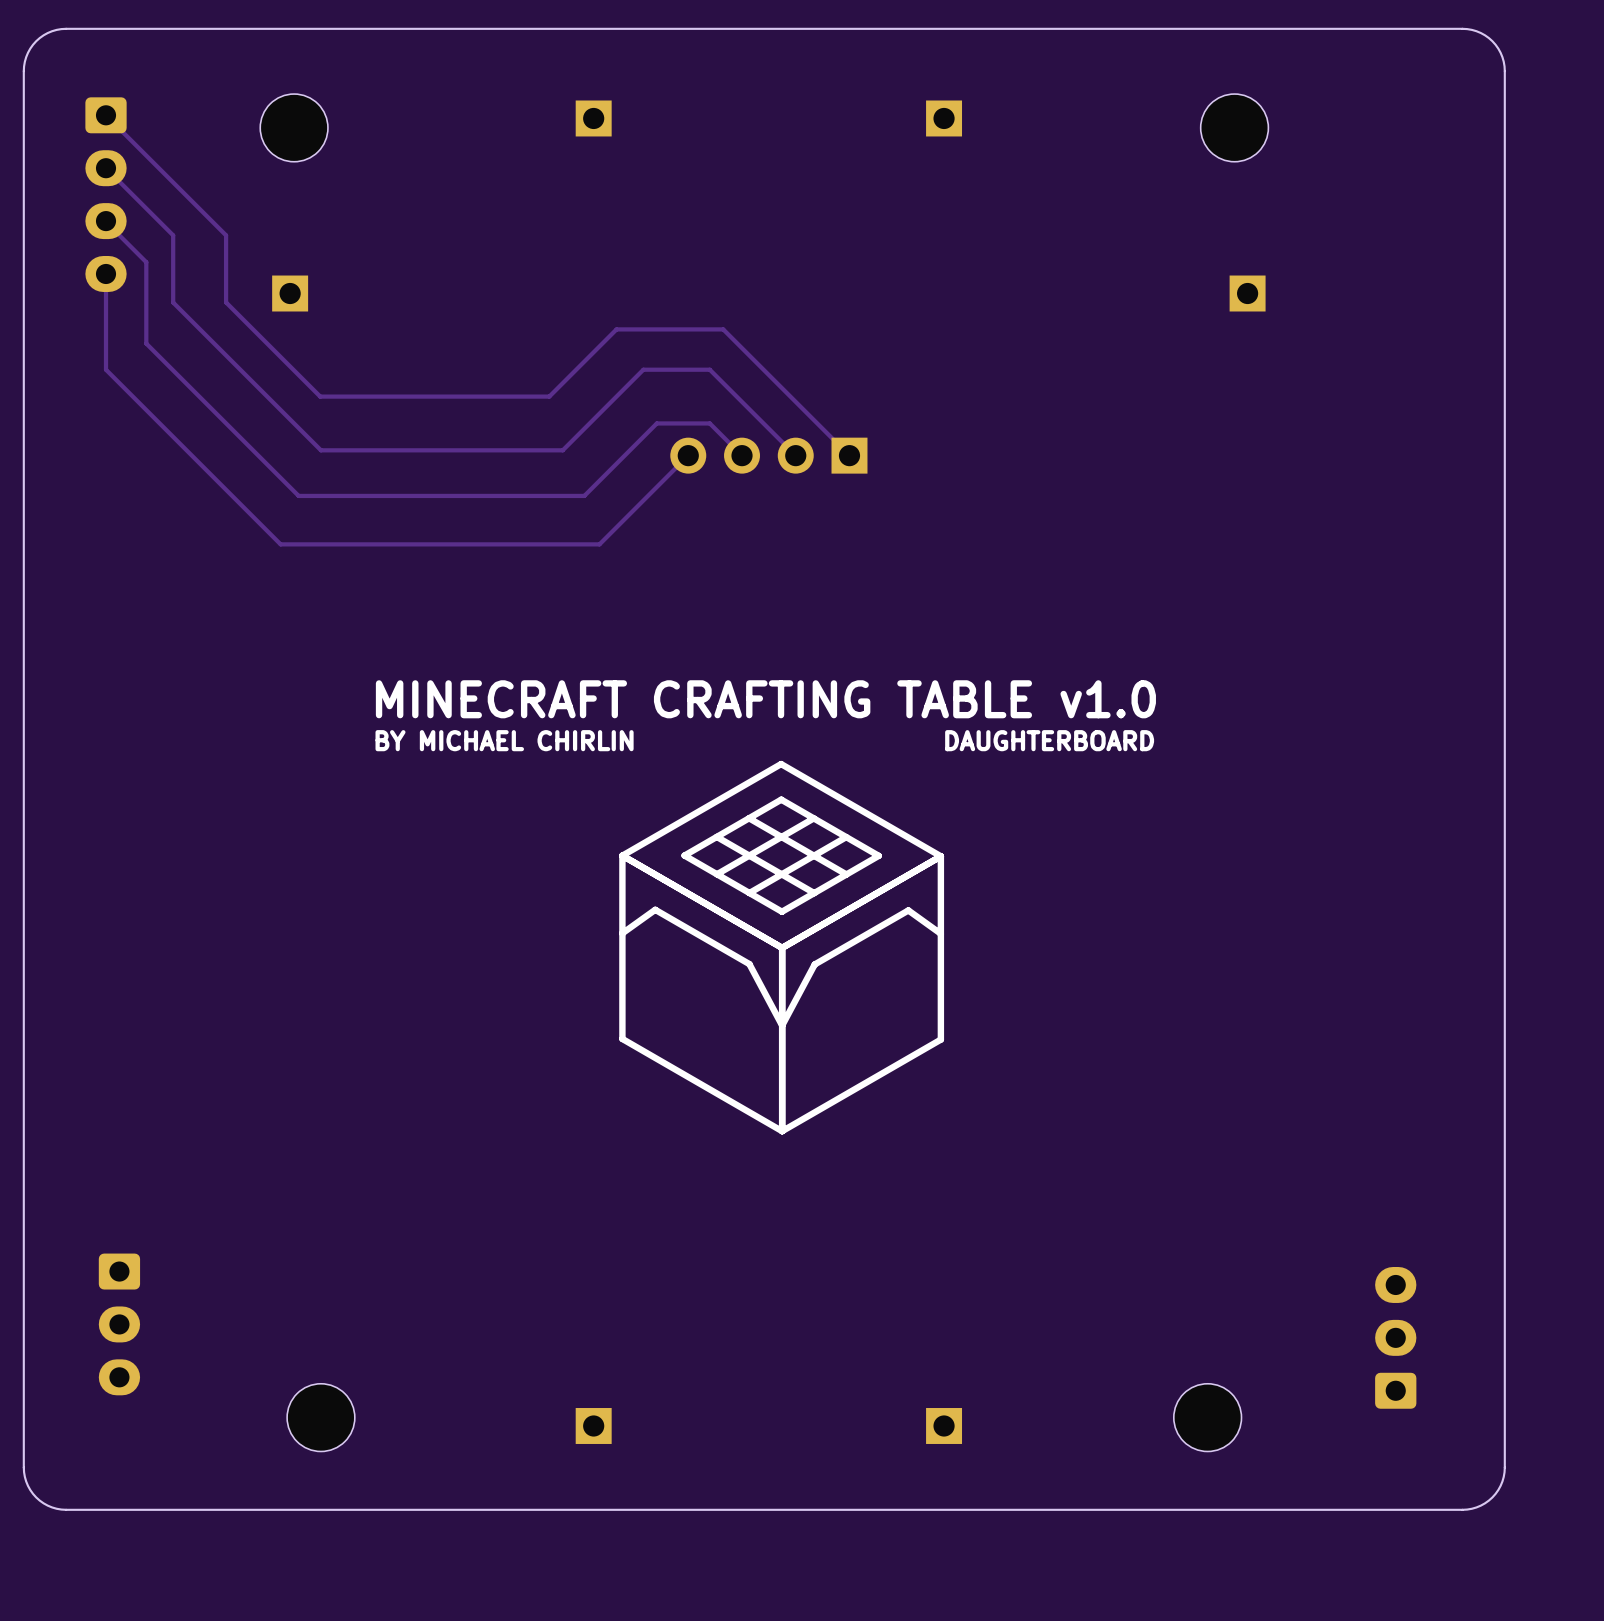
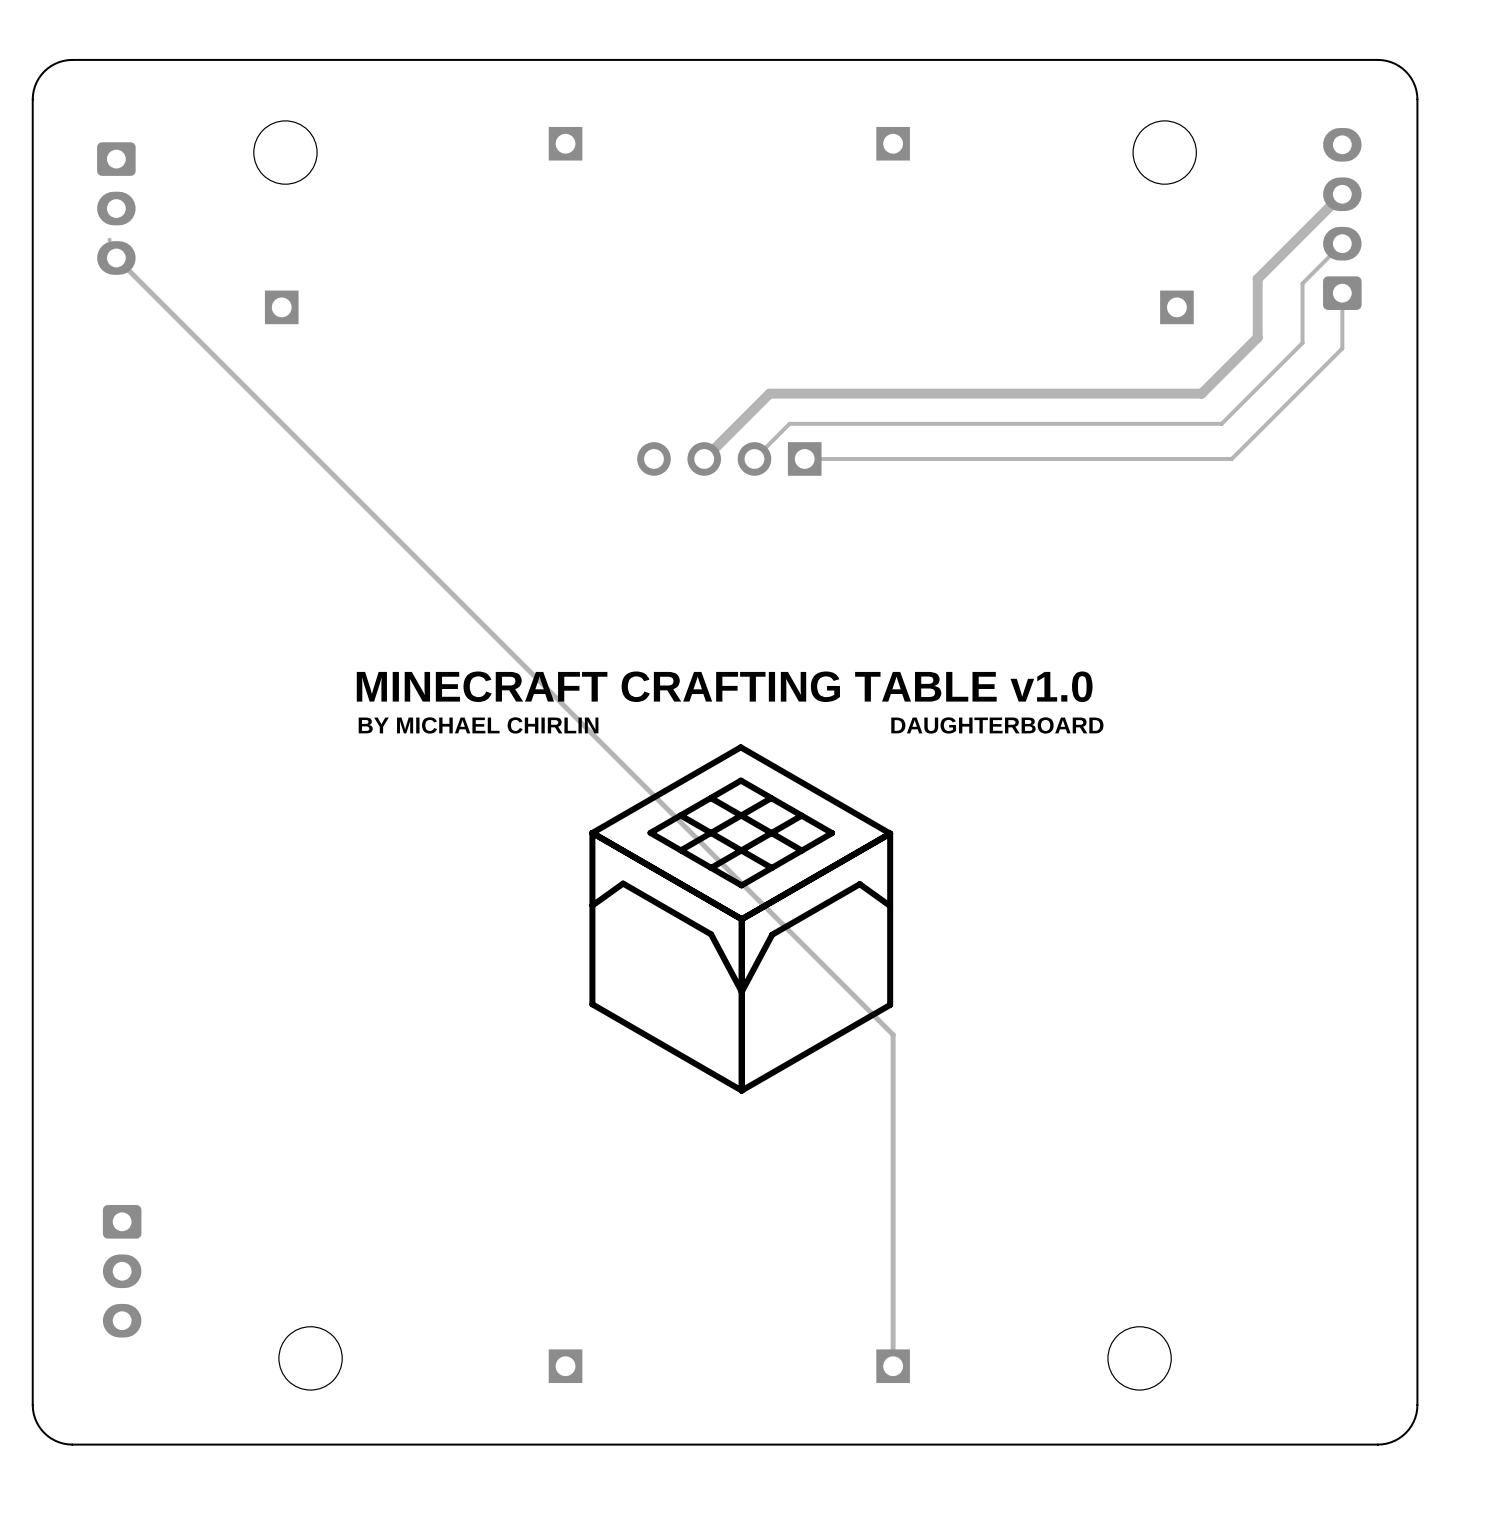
part footprint: [85, 97, 127, 292] -> [97, 142, 136, 275]
track: (106, 115) (226, 235) (226, 302) (320, 396) (549, 396) (616, 329) (723, 329) (849, 455) -> (1342, 293) (1342, 348) (1231, 458) (804, 458)
track: (106, 168) (173, 235) (173, 302) (320, 450) (562, 450) (643, 369) (709, 369) (795, 455) -> (1342, 243) (1302, 283) (1302, 343) (1221, 423) (789, 423) (754, 458)
part: none -> (1342, 218)
track: (106, 221) (146, 262) (146, 343) (298, 495) (584, 495) (656, 423) (709, 423) (742, 455) -> (1342, 194) (1257, 278) (1257, 337) (1201, 393) (769, 393) (704, 458)
track: none -> (116, 257) (893, 1034) (893, 1366)
track: (106, 273) (106, 369) (280, 544) (599, 544) (688, 455) -> none
part: (1395, 1337) -> none

